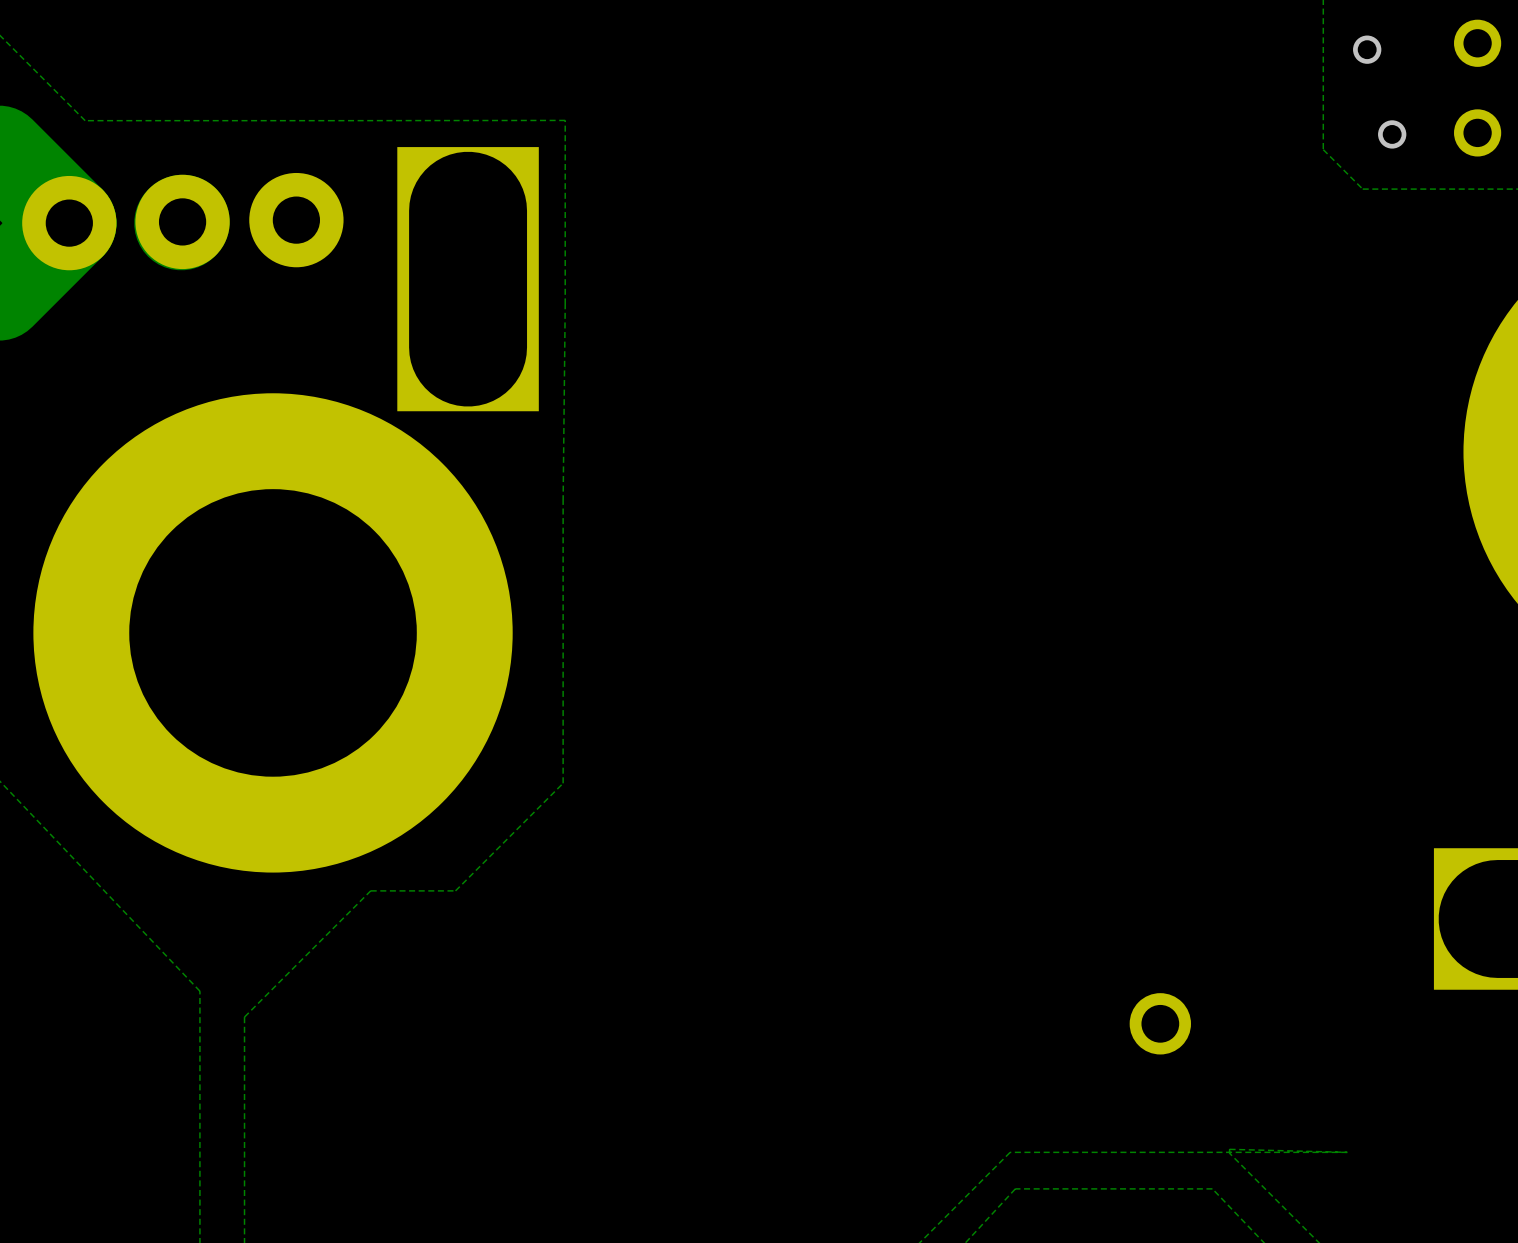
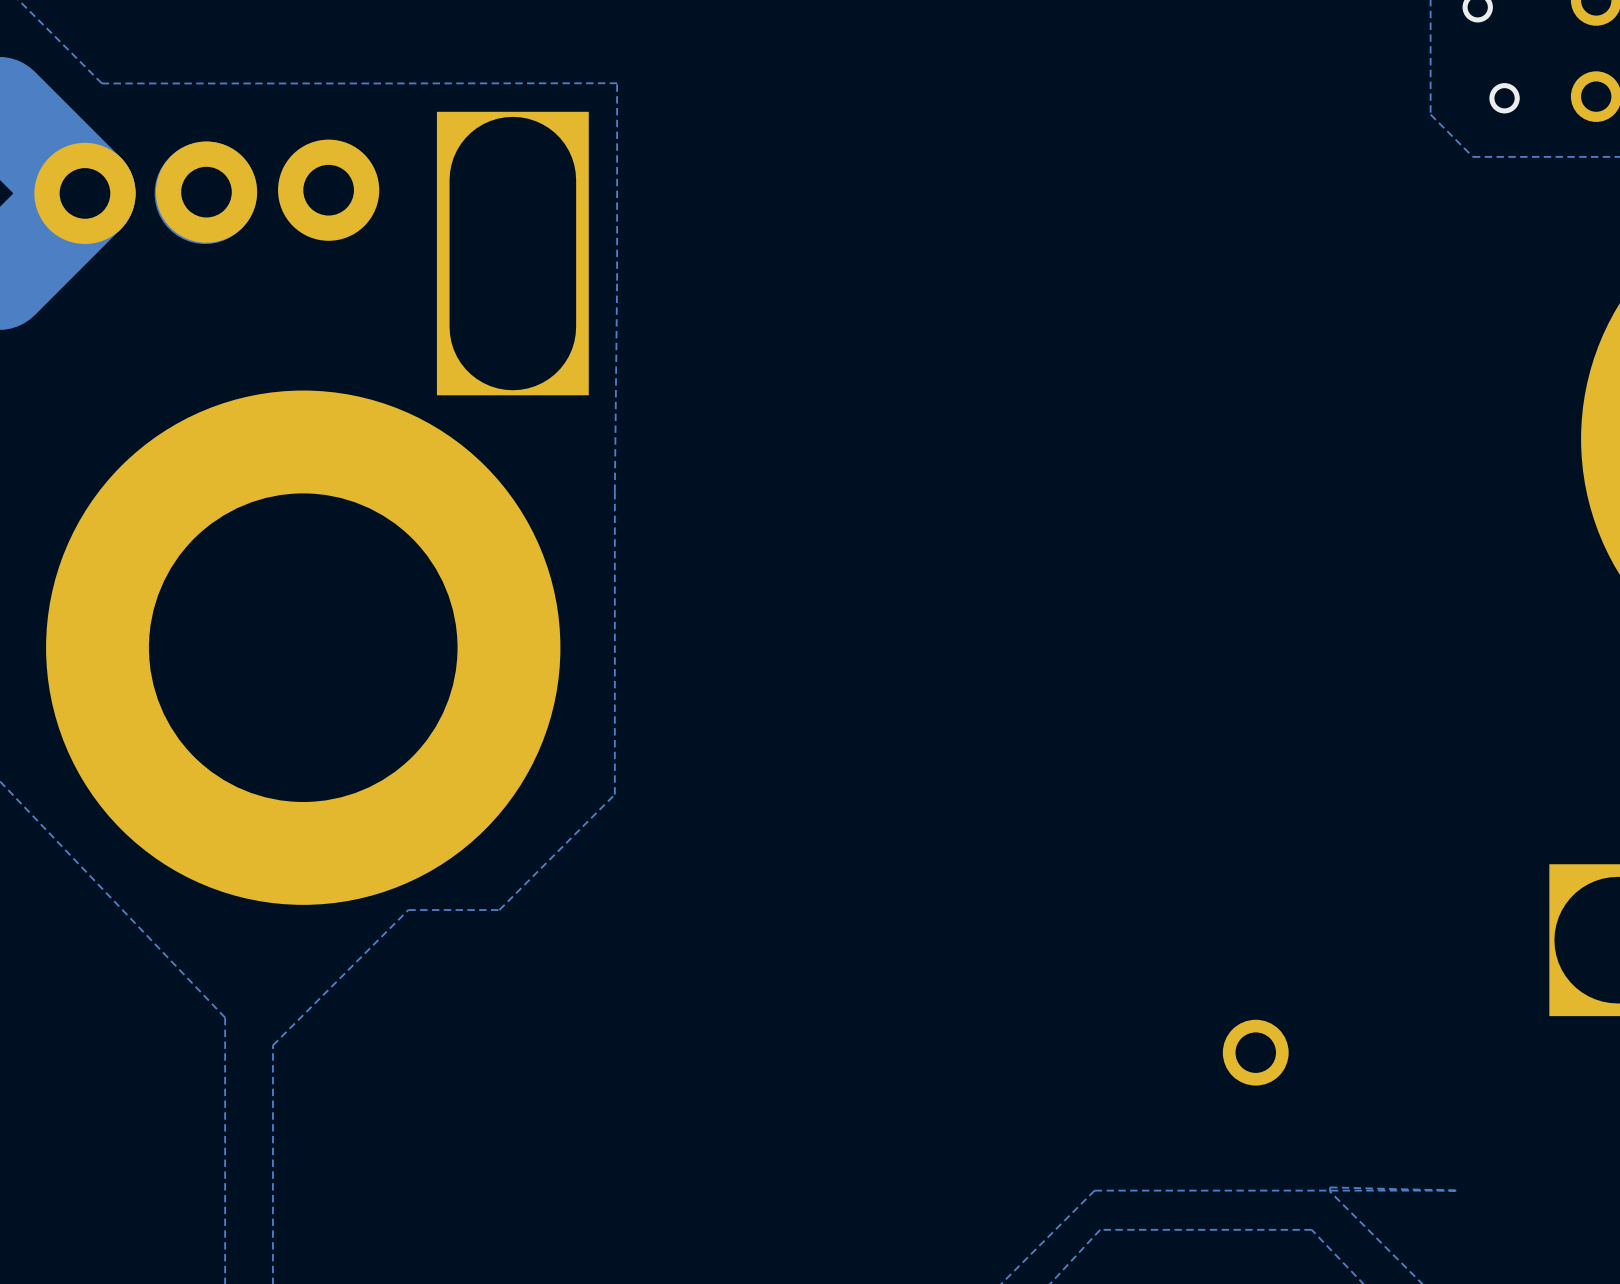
part position: (273, 632) -> (303, 647)

